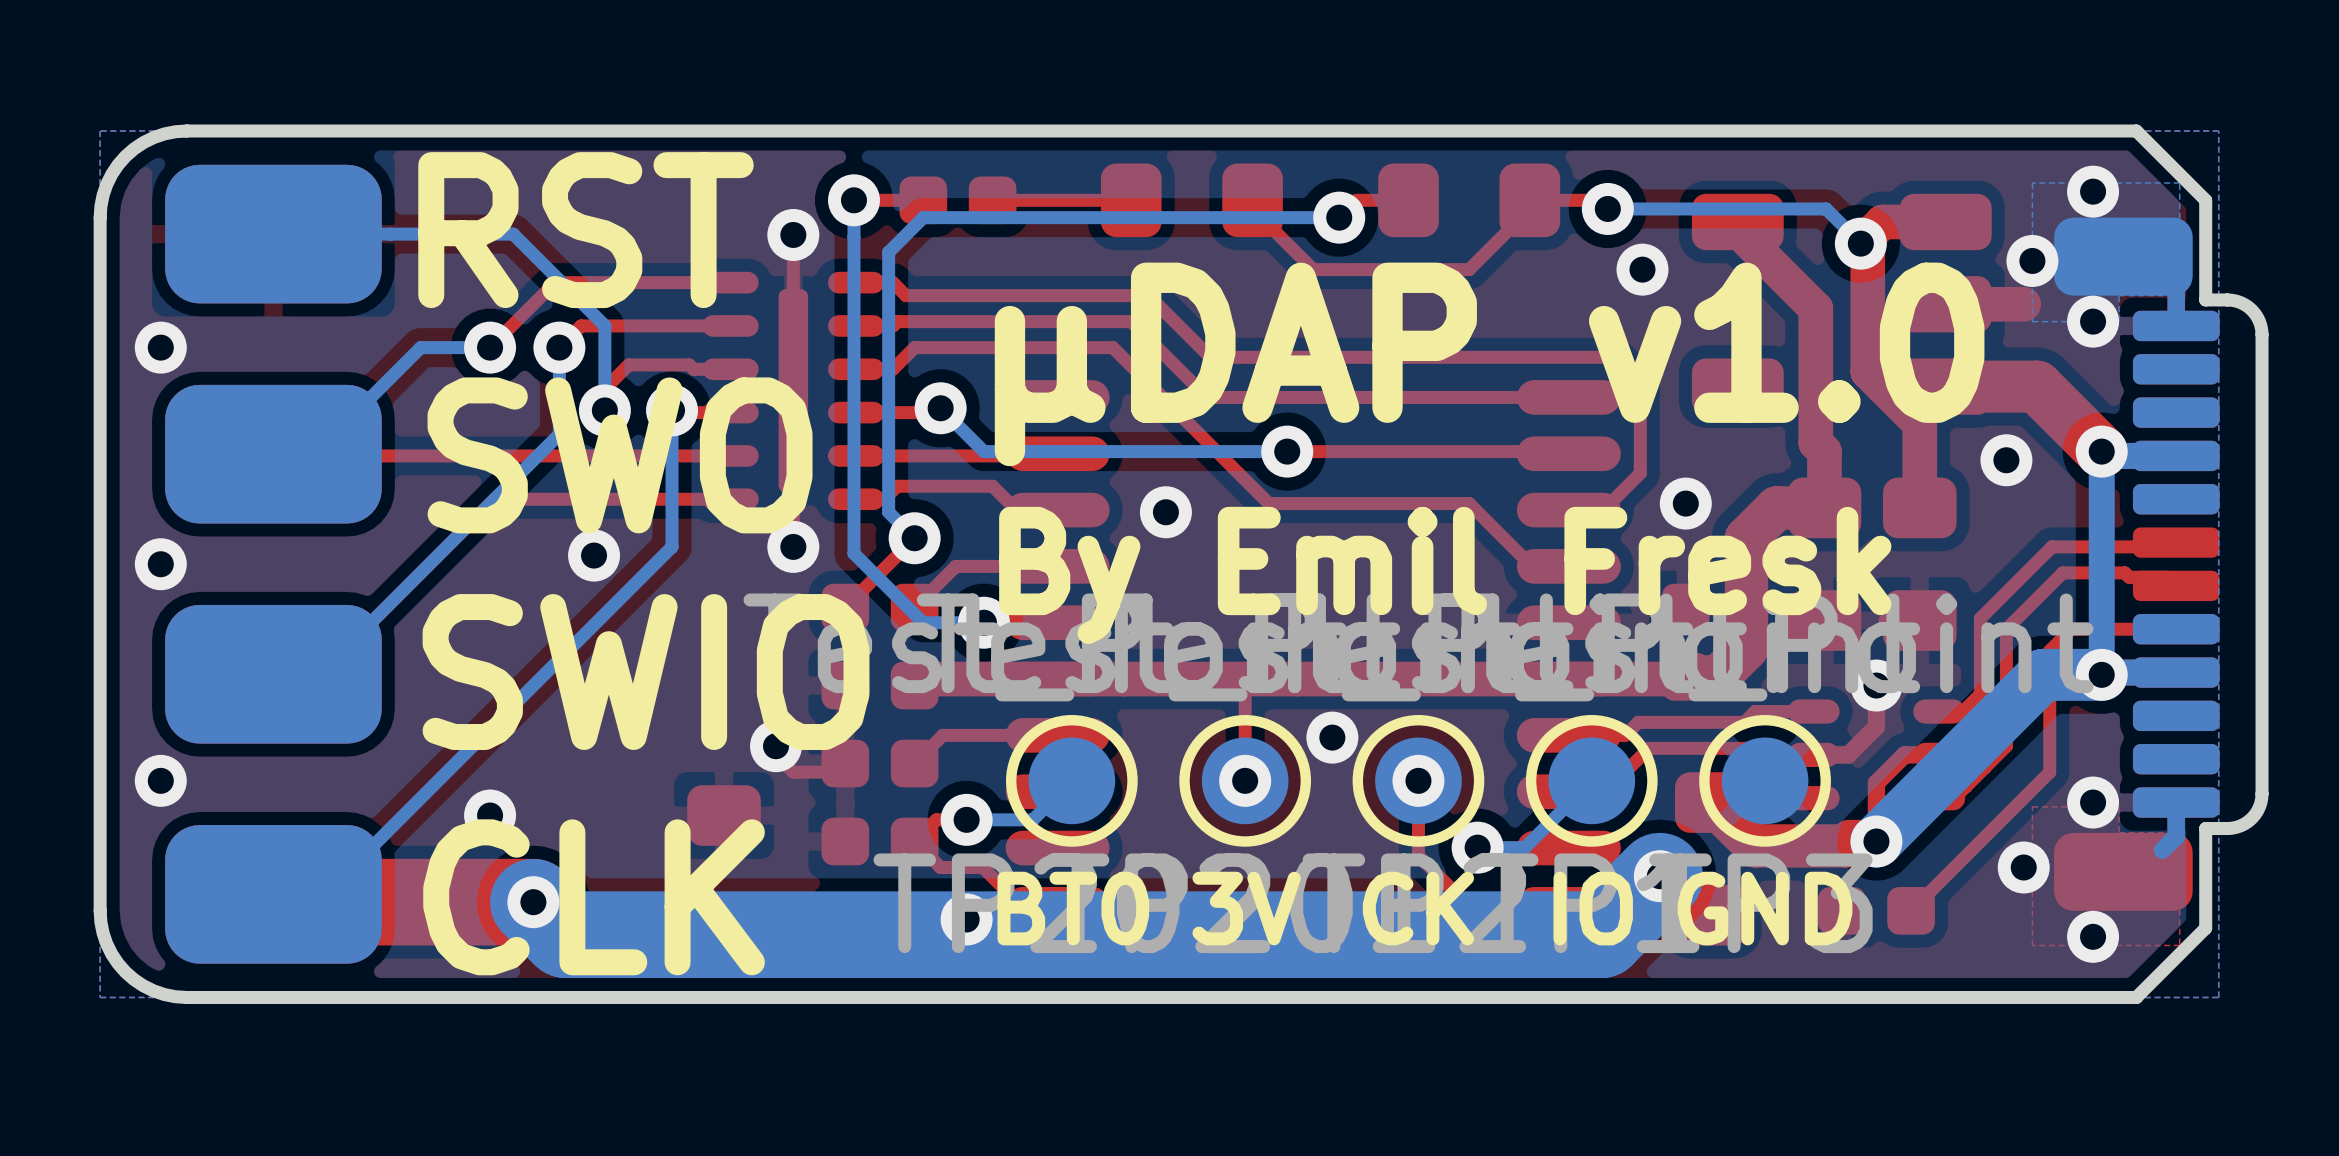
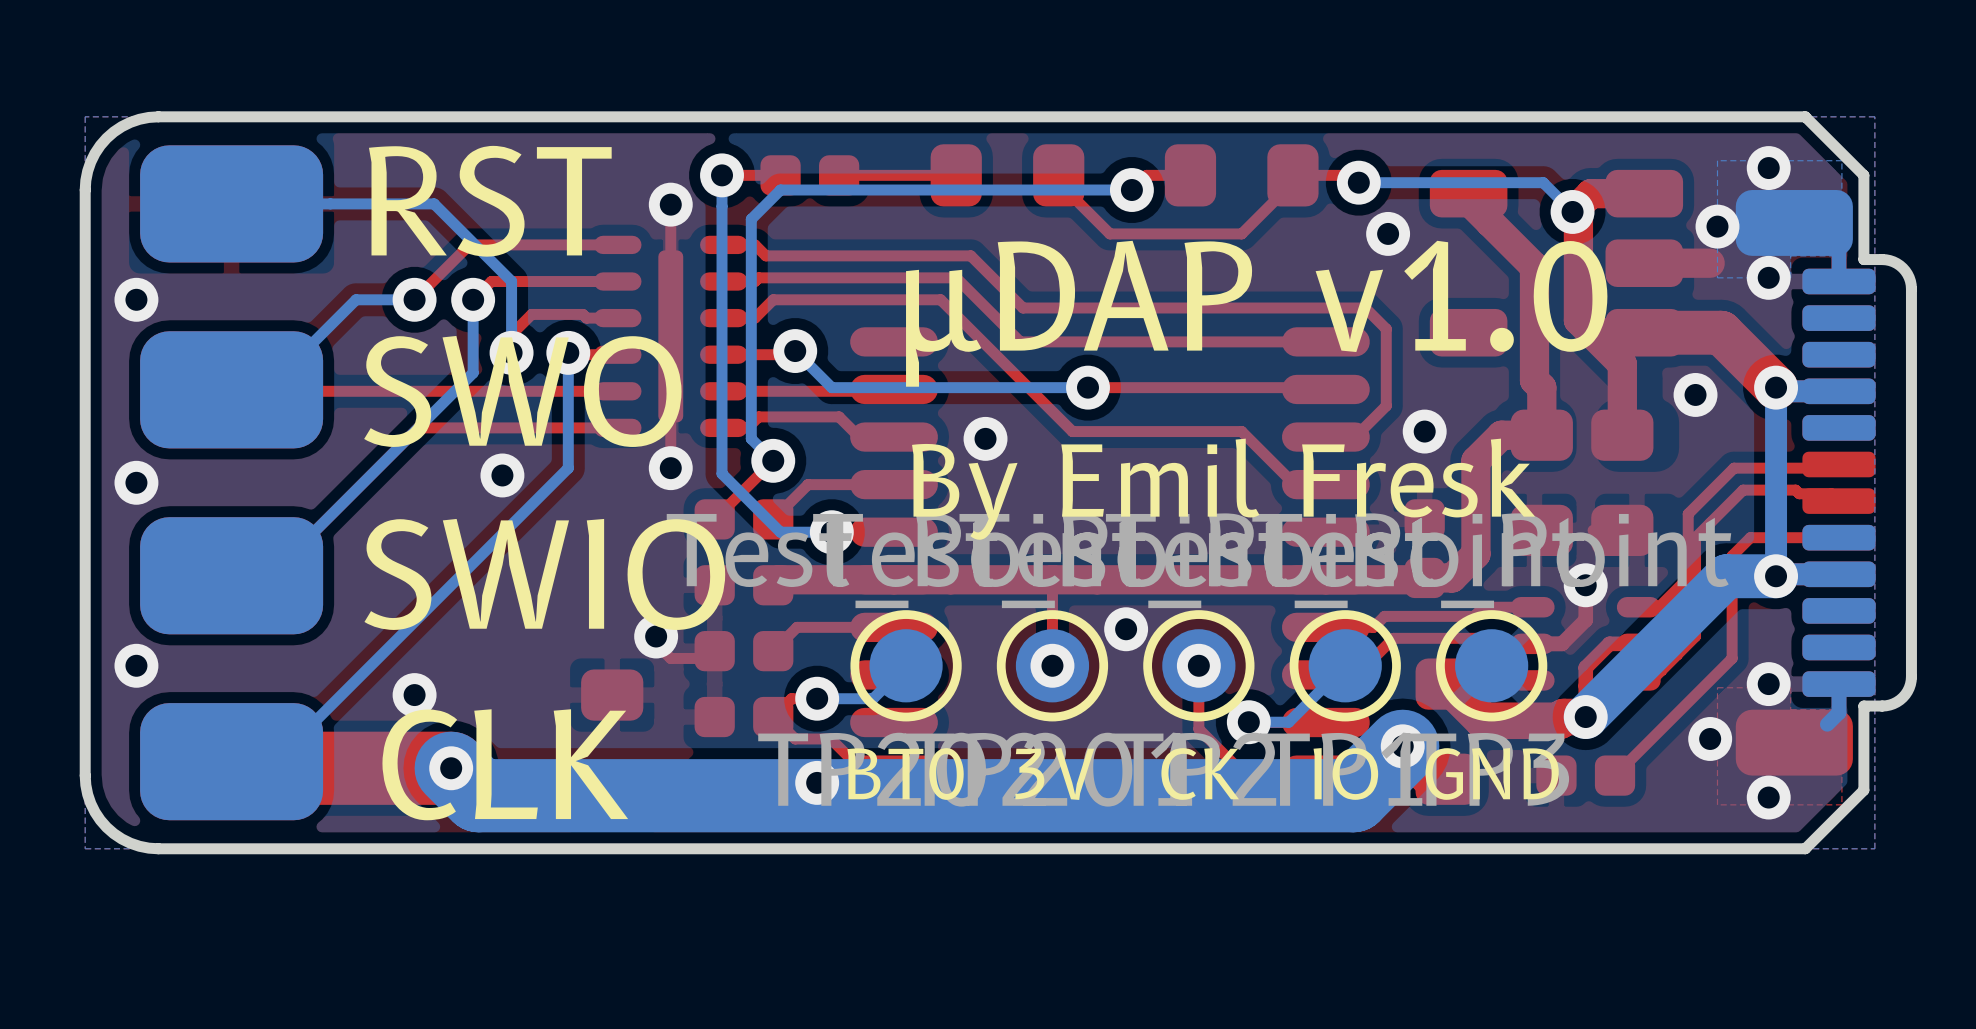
top track width: thick (1815, 507) (1776, 507) (1746, 538) (1746, 648) (1718, 676) (1685, 676) -> thin (1534, 435) (1501, 435) (1475, 460) (1475, 554) (1452, 577) (1424, 577)
top track: (1997, 601) (1980, 618) (1980, 694) -> (1688, 513) (1688, 577) (1673, 592)

